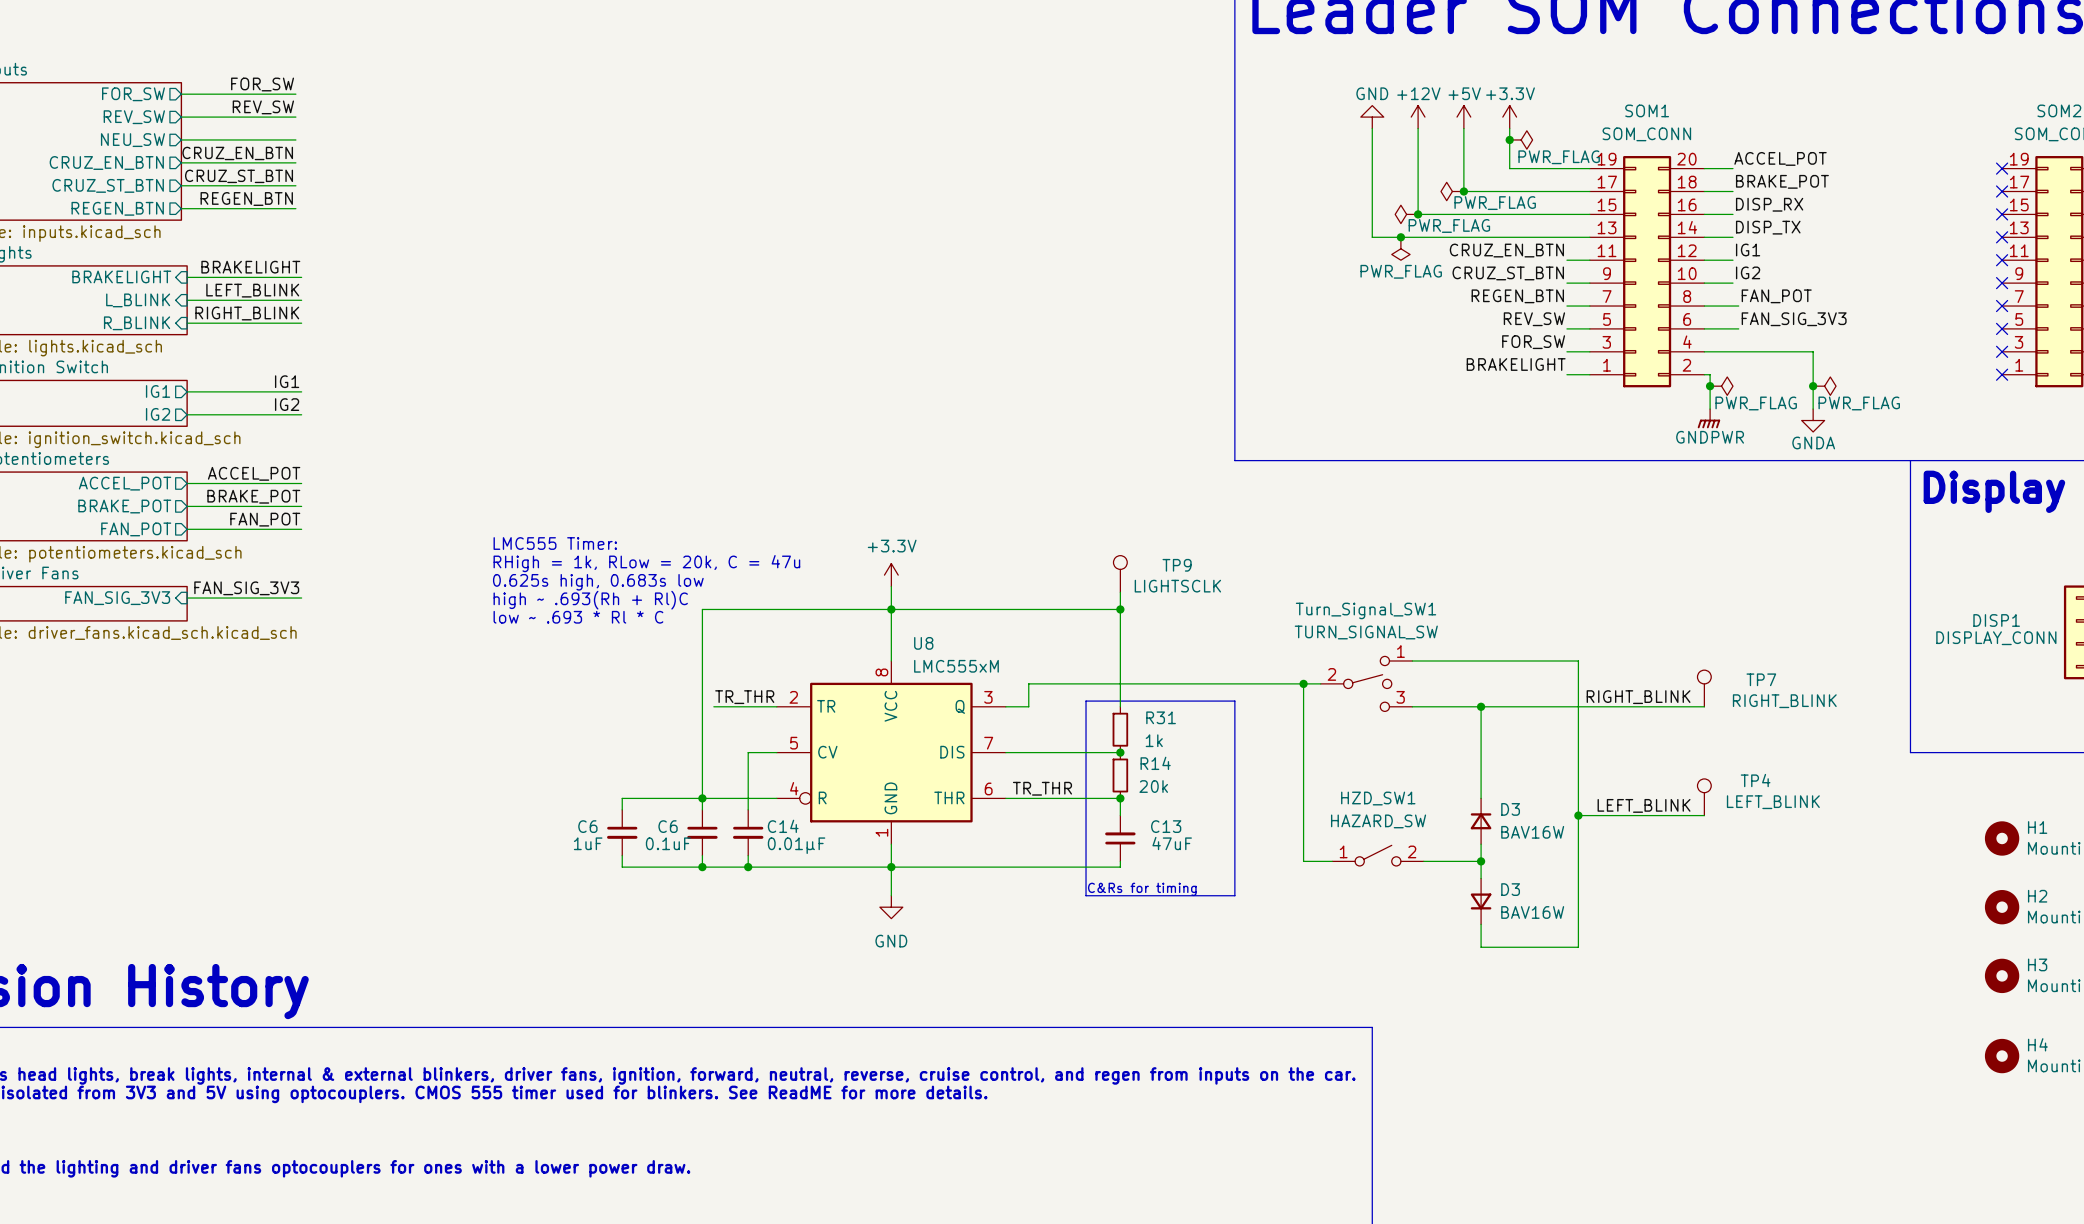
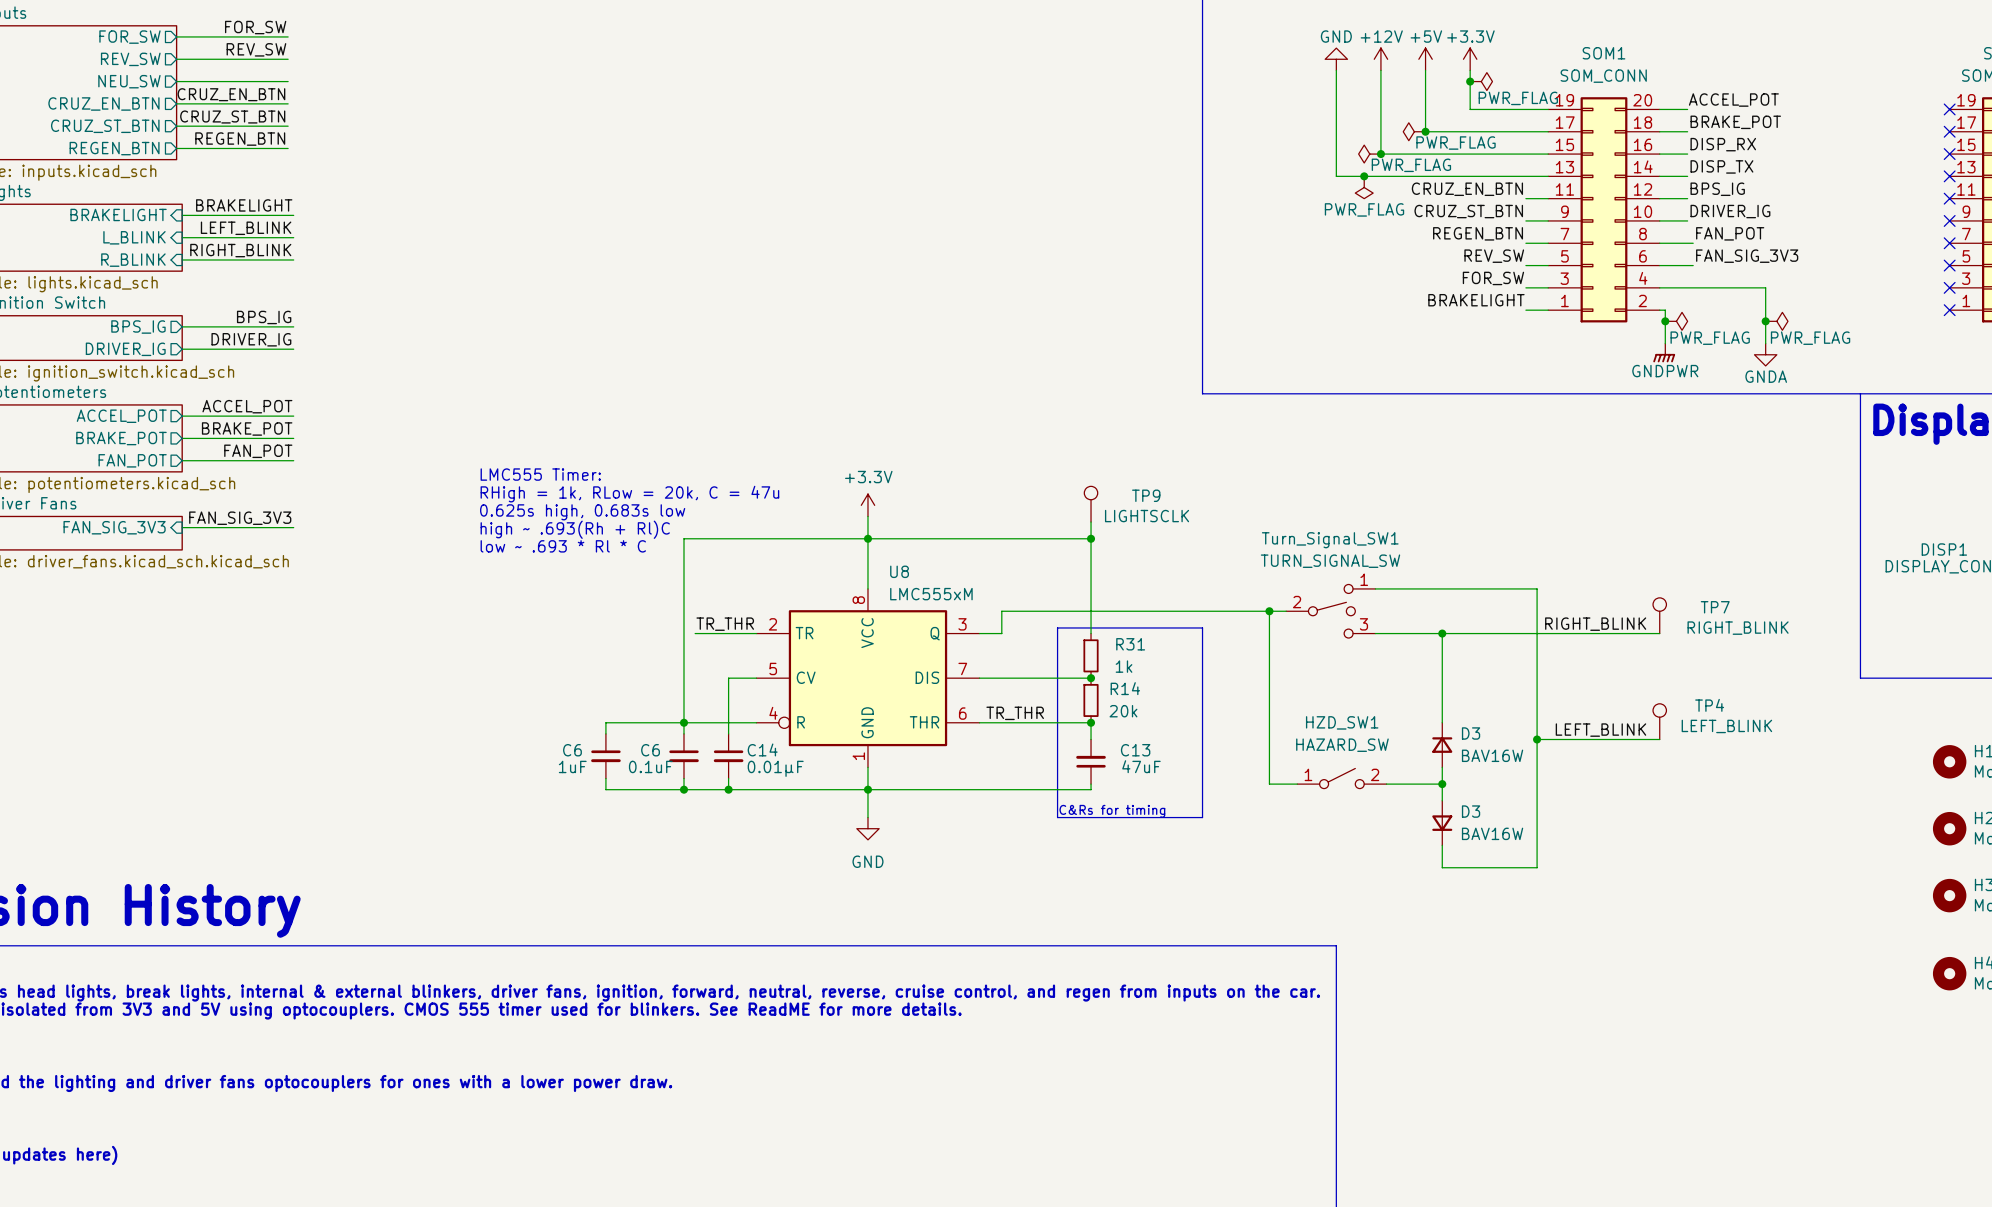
label: IG1 (1748, 249) -> BPS_IG (1717, 189)
label: IG2 (1748, 272) -> DRIVER_IG (1730, 211)
label: IG1 (287, 381) -> BPS_IG (264, 317)
sheet pin: IG1 (158, 391) -> BPS_IG (138, 327)
label: IG2 (287, 404) -> DRIVER_IG (251, 339)
sheet pin: IG2 (158, 414) -> DRIVER_IG (125, 349)

